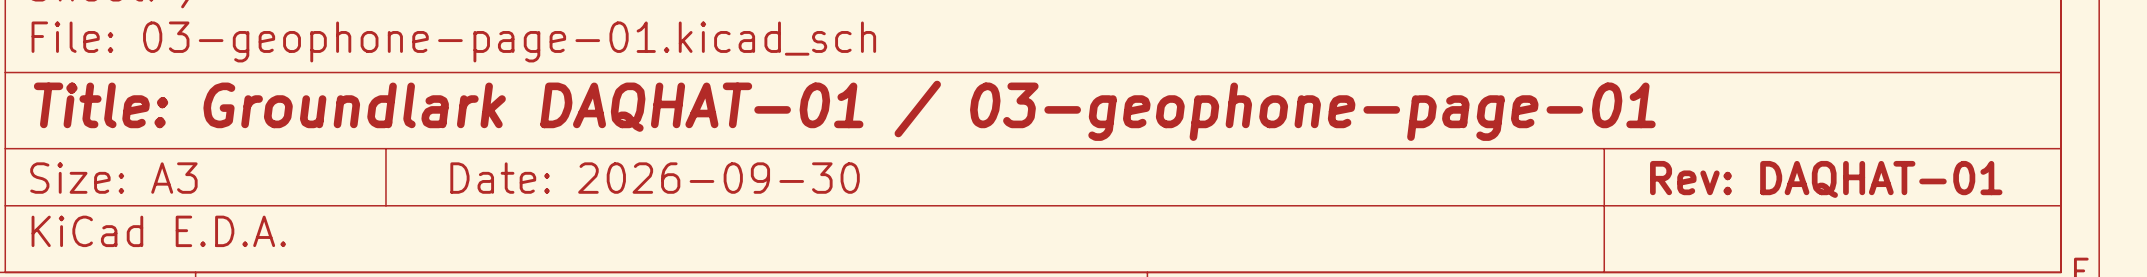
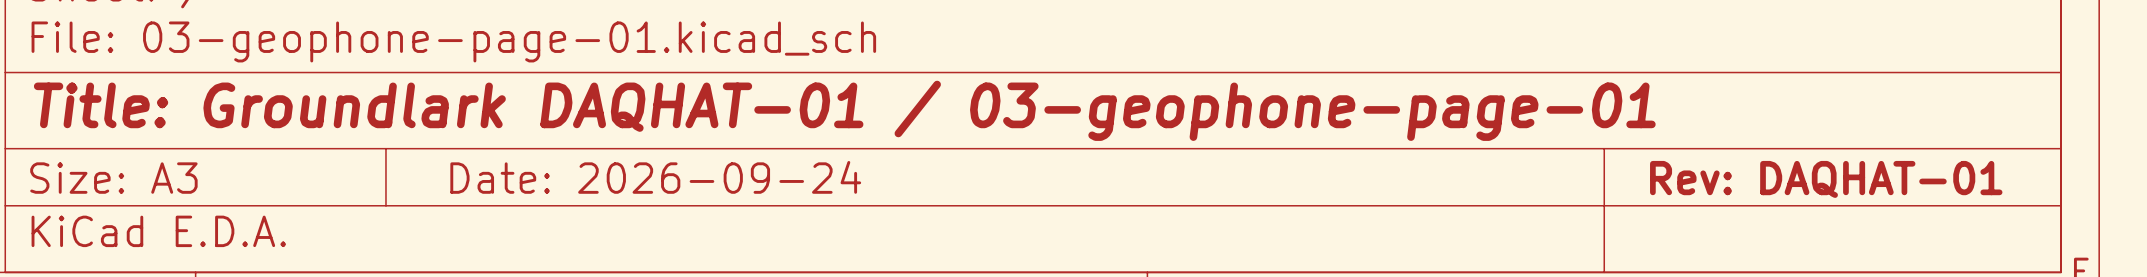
title block: Date: 2026-09-30 (655, 178) -> Date: 2026-09-24 (655, 177)

